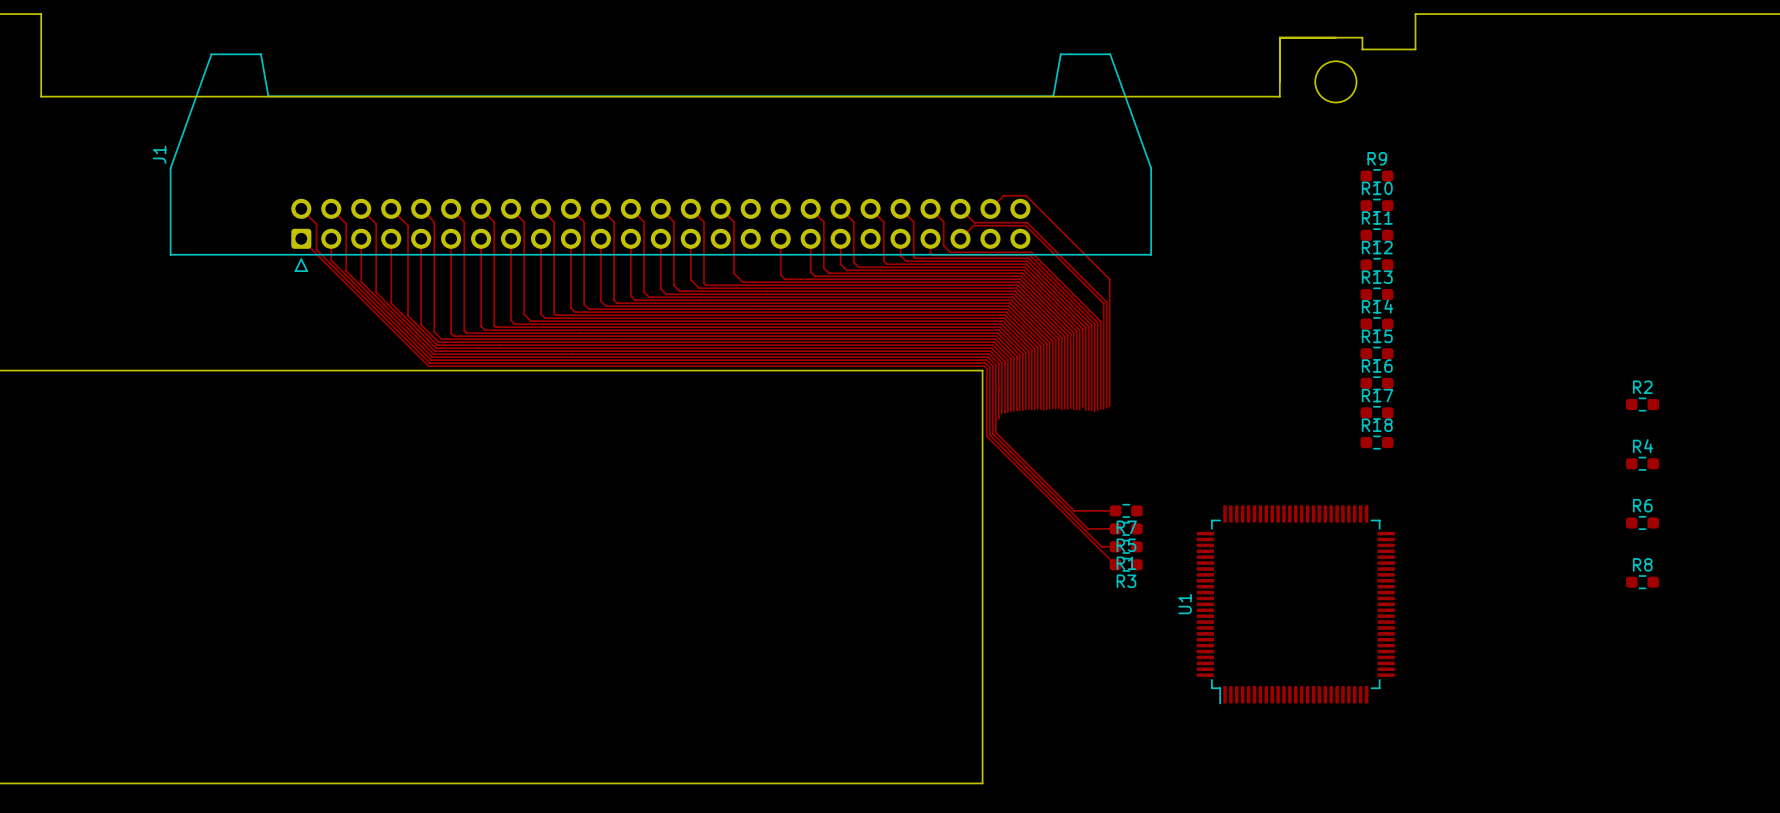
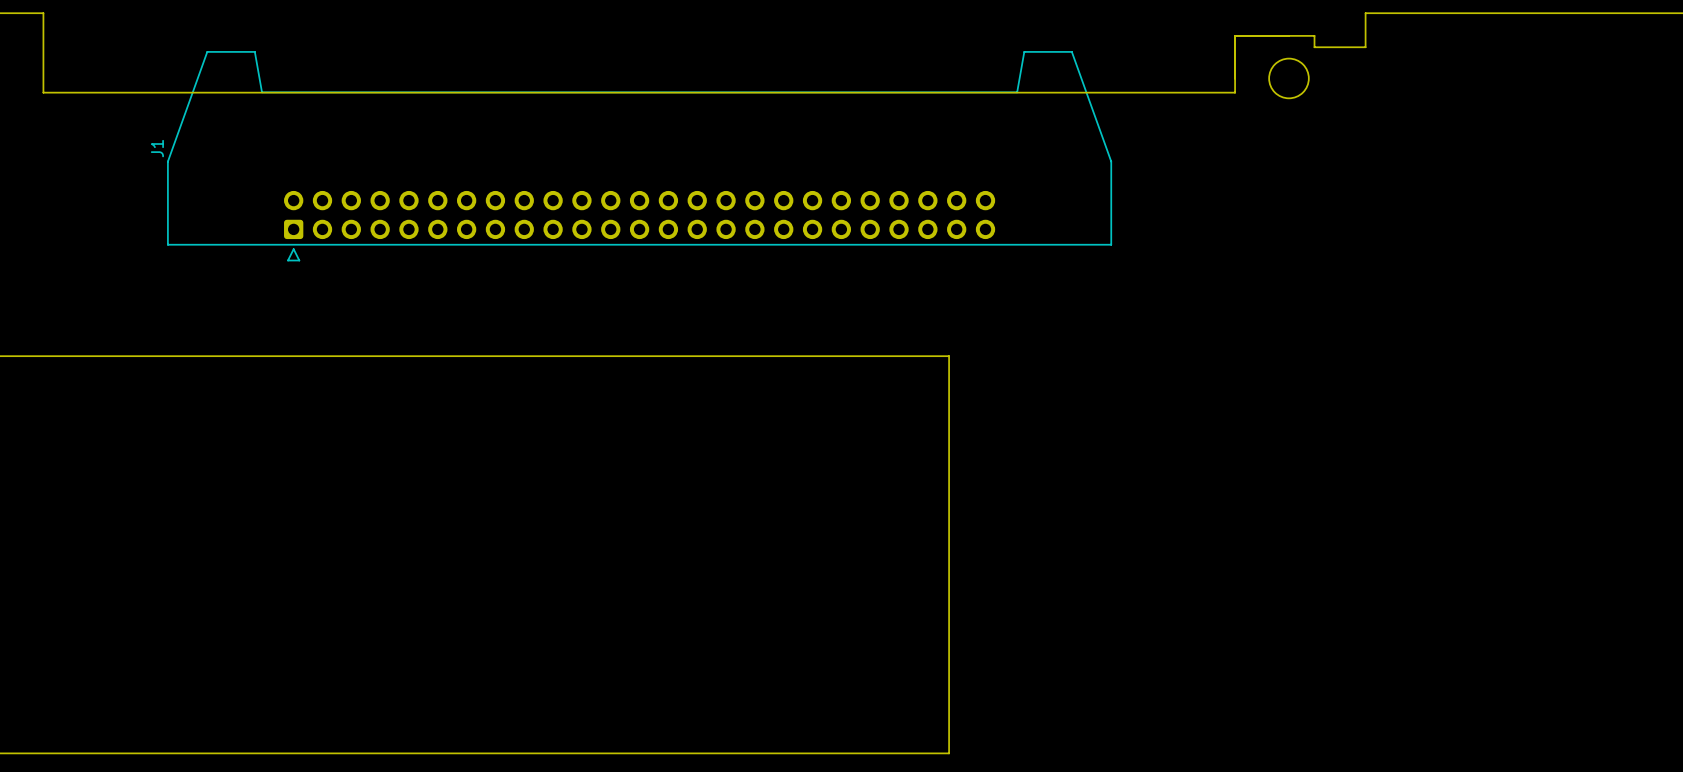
R9: (1377, 176) -> none
R10: (1377, 205) -> none
track: (301, 208) (316, 224) (316, 249) (429, 363) (985, 363) (989, 367) (989, 434) (1101, 546) (1115, 546) -> none
track: (331, 208) (346, 223) (346, 271) (432, 357) (987, 357) (995, 365) (995, 432) (1074, 510) (1115, 510) -> none
track: (361, 208) (376, 223) (376, 292) (434, 351) (990, 351) (1001, 362) (1001, 413) -> none
track: (391, 208) (408, 225) (408, 315) (437, 345) (992, 345) (1007, 360) (1007, 412) -> none
track: (421, 208) (434, 221) (434, 331) (441, 339) (995, 339) (1013, 357) (1013, 410) -> none
track: (451, 208) (464, 221) (464, 330) (466, 333) (997, 333) (1019, 355) (1019, 410) -> none
track: (481, 208) (494, 221) (495, 327) (1000, 327) (1025, 352) (1025, 409) -> none
track: (511, 208) (524, 221) (524, 314) (531, 321) (1002, 321) (1031, 350) (1031, 409) -> none
track: (541, 208) (554, 221) (554, 313) (555, 315) (1005, 315) (1037, 347) (1037, 408) -> none
track: (570, 208) (584, 221) (584, 304) (588, 309) (1007, 309) (1043, 345) (1043, 409) -> none
track: (600, 208) (614, 221) (614, 300) (617, 303) (1010, 303) (1049, 342) (1049, 408) -> none
track: (630, 208) (644, 221) (644, 292) (649, 297) (1012, 297) (1055, 340) (1055, 408) -> none
track: (660, 208) (674, 221) (674, 285) (679, 291) (1015, 291) (1061, 337) (1061, 409) -> none
track: (690, 208) (703, 221) (703, 283) (706, 285) (1017, 285) (1067, 335) (1067, 409) -> none
track: (720, 208) (733, 221) (733, 273) (742, 282) (1018, 282) (1070, 334) (1070, 408) -> none
track: (810, 208) (823, 221) (823, 268) (828, 273) (1022, 273) (1079, 330) (1079, 409) -> none
track: (840, 208) (853, 221) (853, 262) (858, 267) (1025, 267) (1085, 327) (1085, 410) -> none
track: (870, 208) (883, 221) (883, 260) (887, 264) -> none
track: (900, 208) (913, 221) (915, 258) (1028, 258) (1094, 324) (1094, 411) -> none
track: (930, 208) (943, 221) (943, 245) (950, 252) (1031, 252) (1100, 321) (1100, 409) -> none
track: (960, 208) (974, 222) (1027, 222) (1106, 302) (1106, 407) -> none
track: (990, 208) (1003, 195) (1026, 195) (1109, 279) (1109, 406) -> none
R11: (1377, 235) -> none
track: (301, 238) (428, 366) (984, 366) (986, 368) (986, 436) (1115, 564) -> none
track: (331, 238) (331, 260) (431, 360) (986, 360) (992, 366) (992, 433) (1087, 528) (1115, 528) -> none
track: (361, 238) (361, 281) (433, 354) (989, 354) (998, 363) (998, 418) -> none
track: (391, 238) (391, 303) (436, 348) (991, 348) (1004, 361) (1004, 412) -> none
track: (421, 238) (421, 324) (438, 342) (994, 342) (1010, 358) (1010, 411) -> none
track: (451, 238) (451, 333) (453, 336) (996, 336) (1016, 356) (1016, 410) -> none
track: (481, 238) (481, 326) (484, 330) (999, 330) (1022, 353) (1022, 410) -> none
track: (511, 238) (511, 320) (514, 324) (1001, 324) (1028, 351) (1028, 409) -> none
track: (541, 238) (541, 314) (545, 318) (1004, 318) (1034, 348) (1034, 409) -> none
track: (570, 238) (570, 308) (575, 312) (1006, 312) (1040, 346) (1040, 409) -> none
track: (600, 238) (600, 301) (606, 306) (1009, 306) (1046, 343) (1046, 409) -> none
track: (630, 238) (630, 296) (635, 300) (1011, 300) (1052, 341) (1052, 408) -> none
track: (660, 238) (660, 288) (666, 294) (1014, 294) (1058, 339) (1058, 408) -> none
track: (690, 238) (690, 279) (699, 288) (1016, 288) (1064, 336) (1064, 409) -> none
track: (780, 238) (780, 275) (784, 279) (1020, 279) (1073, 332) (1073, 409) -> none
track: (810, 238) (810, 272) (814, 276) (1021, 276) (1076, 331) (1076, 409) -> none
track: (840, 238) (840, 264) (846, 270) (1023, 270) (1082, 329) (1082, 406) -> none
track: (900, 238) (900, 255) (906, 261) (1027, 261) (1091, 325) (1091, 410) -> none
track: (930, 238) (930, 252) (932, 255) (1030, 255) (1097, 322) (1097, 410) -> none
track: (960, 238) (973, 225) (1025, 225) (1103, 303) (1103, 408) -> none
track: (886, 264) (1026, 264) (1088, 326) (1088, 410) -> none
R12: (1377, 264) -> none
R13: (1377, 294) -> none
R14: (1377, 324) -> none
R15: (1377, 353) -> none
R16: (1377, 383) -> none
R2: (1642, 404) -> none
R17: (1377, 412) -> none
R18: (1377, 442) -> none
R4: (1642, 463) -> none
R7: (1126, 510) -> none
R6: (1642, 522) -> none
R5: (1126, 528) -> none
R1: (1126, 546) -> none
R3: (1126, 564) -> none
R8: (1642, 582) -> none
U1: (1295, 604) -> none

